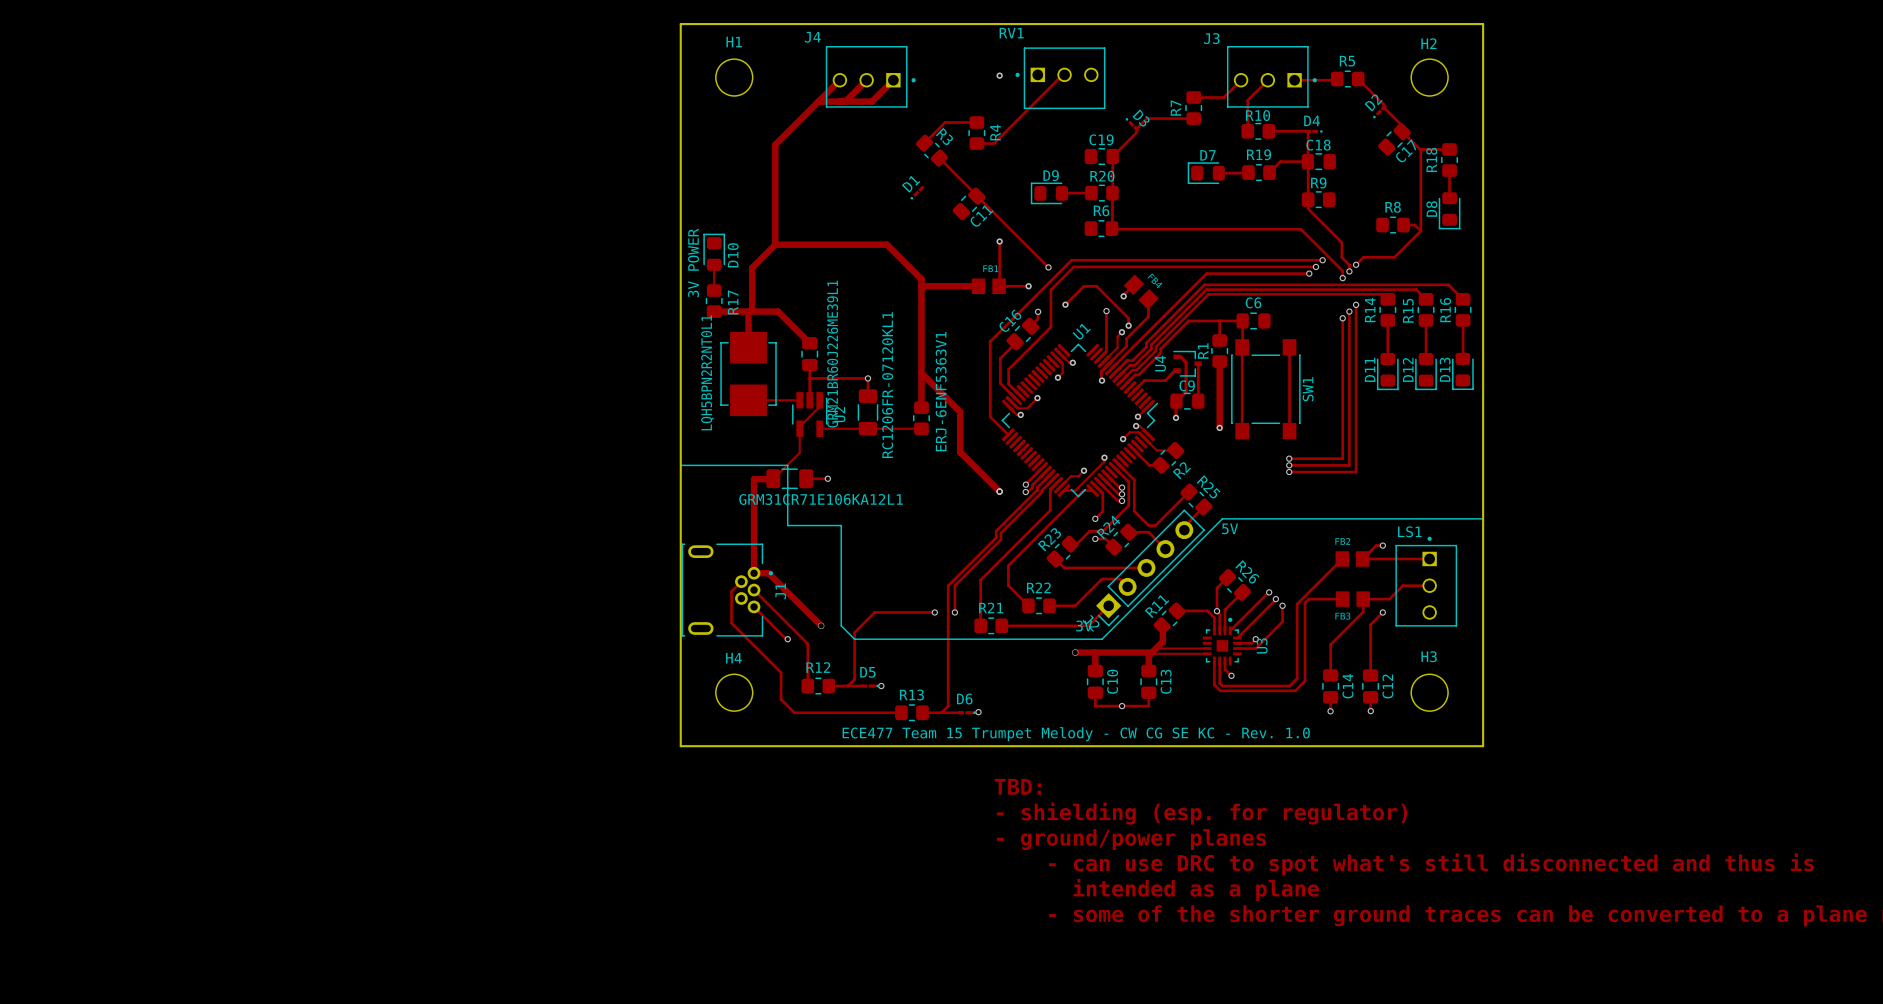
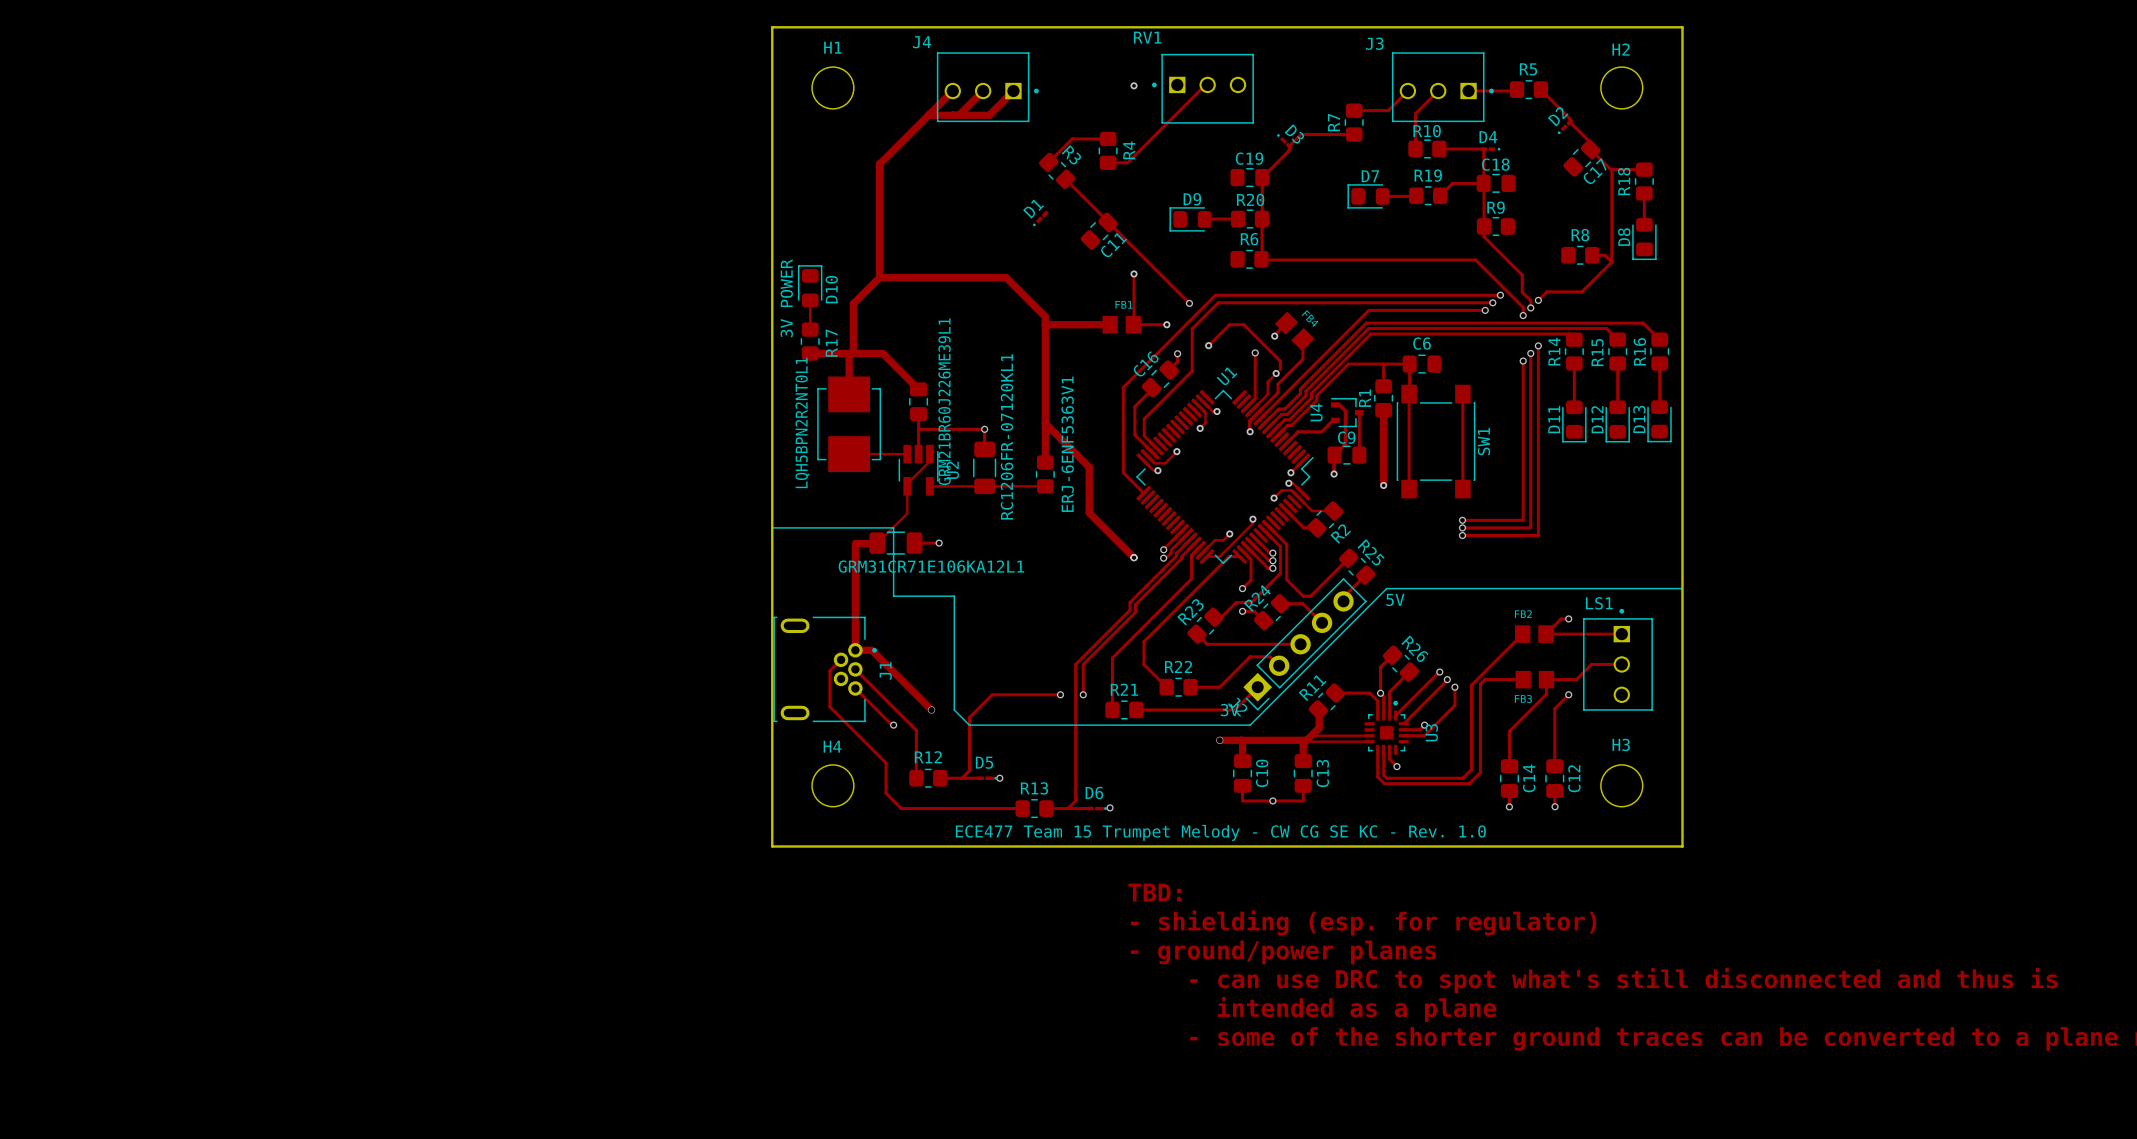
via: (1128, 325) -> none
via: none -> (1276, 373)
via: (1121, 332) -> none

